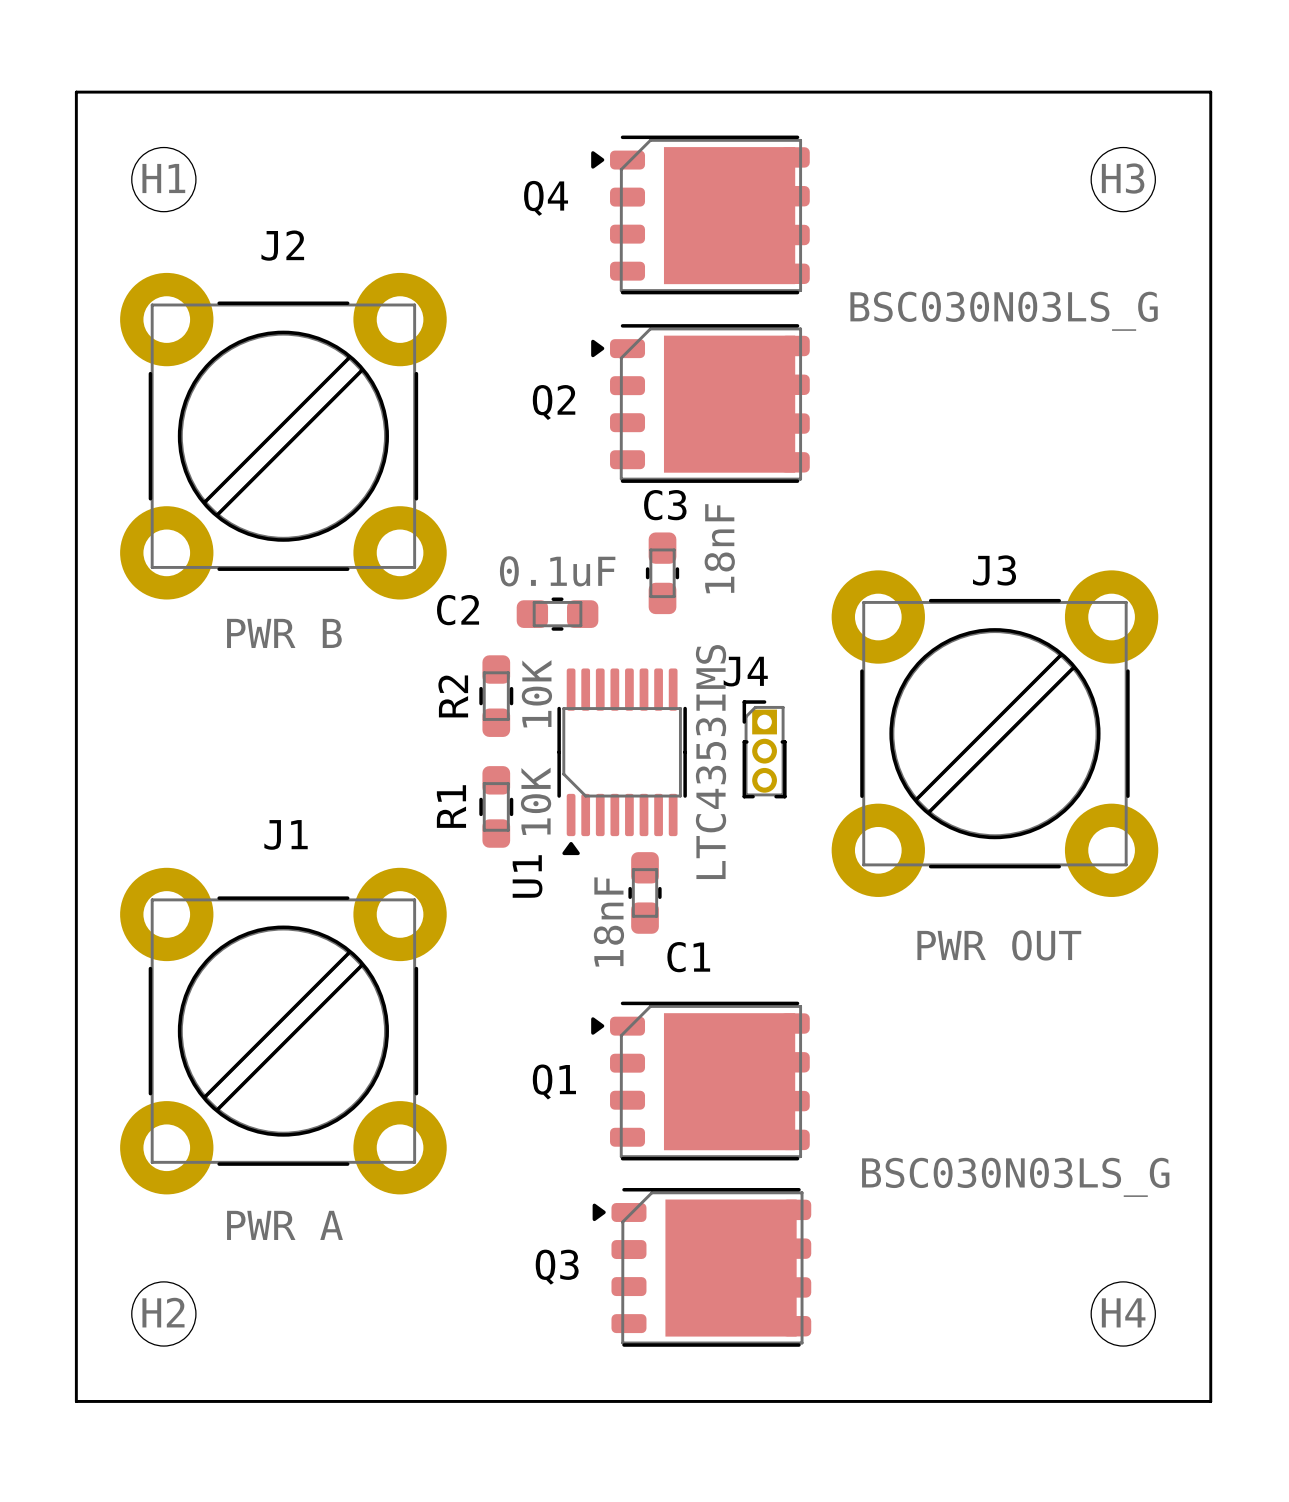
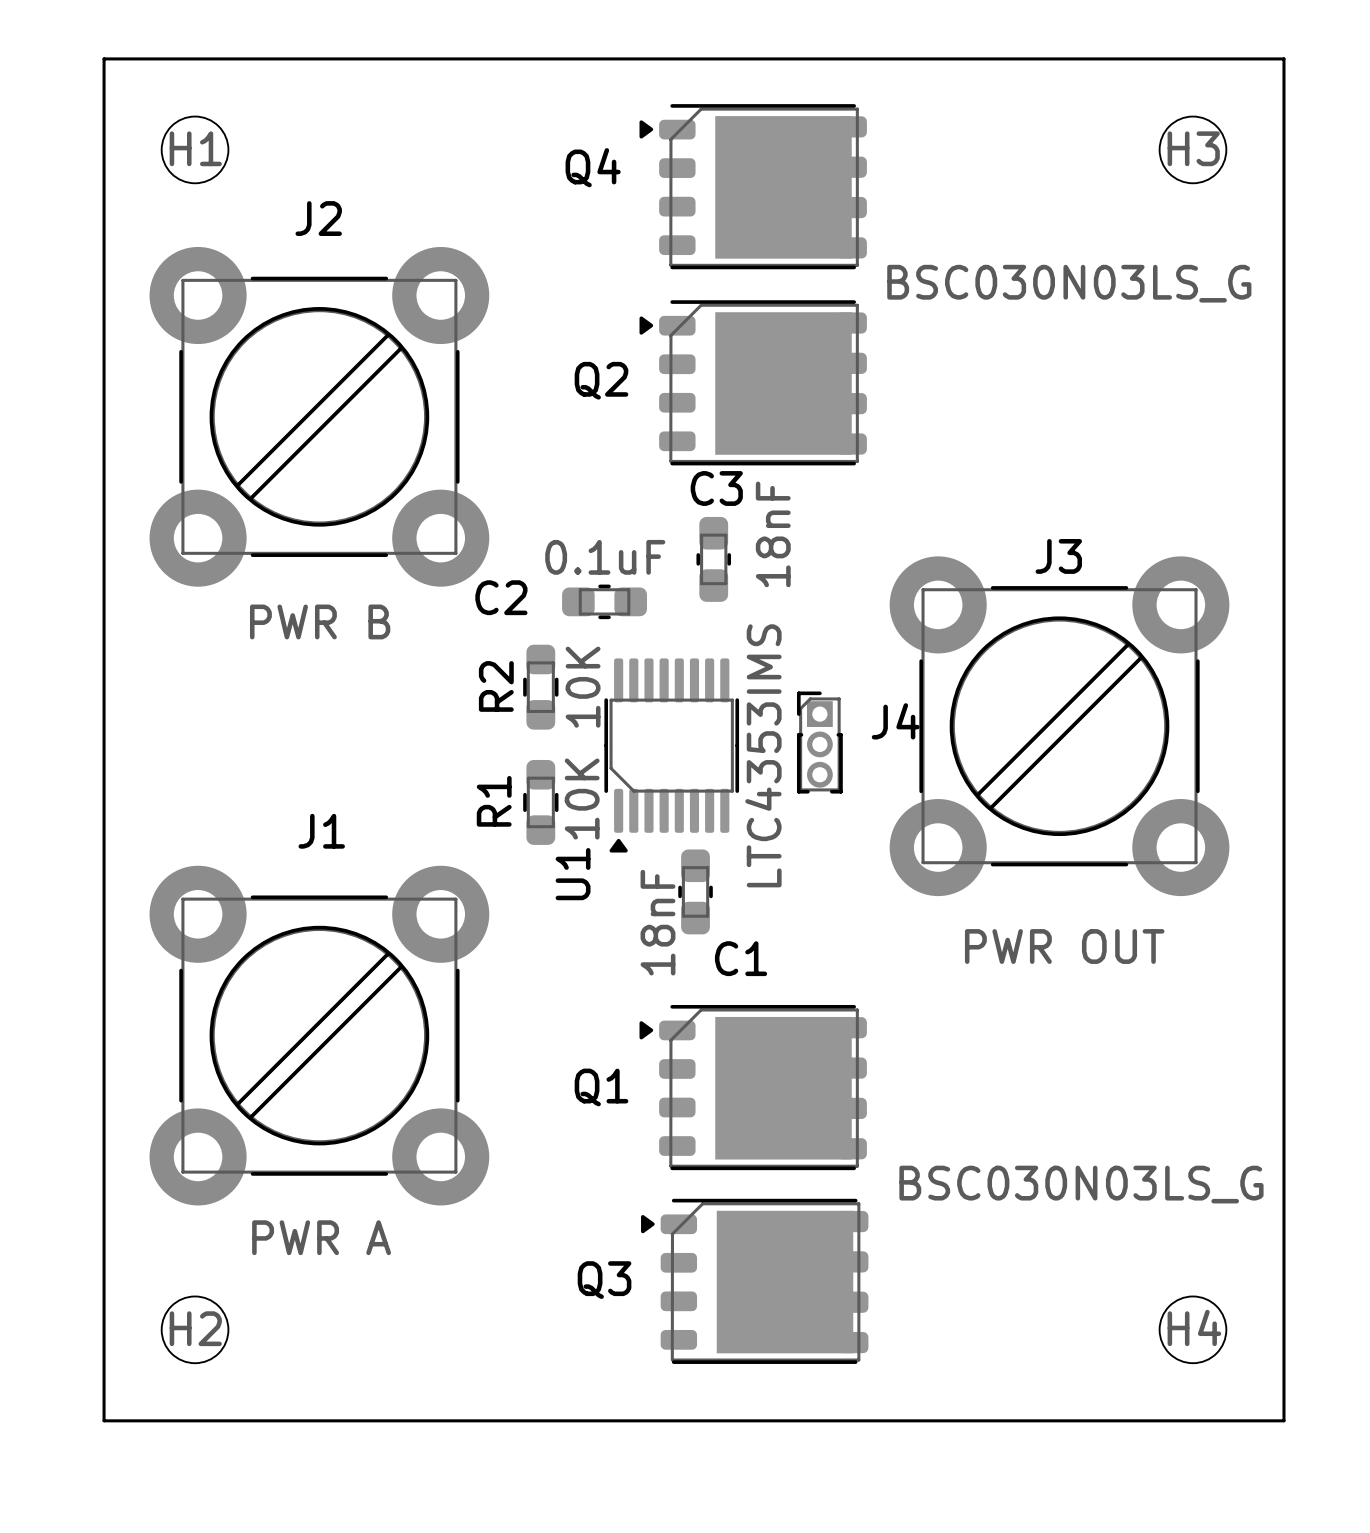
J4 name position: J4 (745, 671) -> J4 (895, 721)

